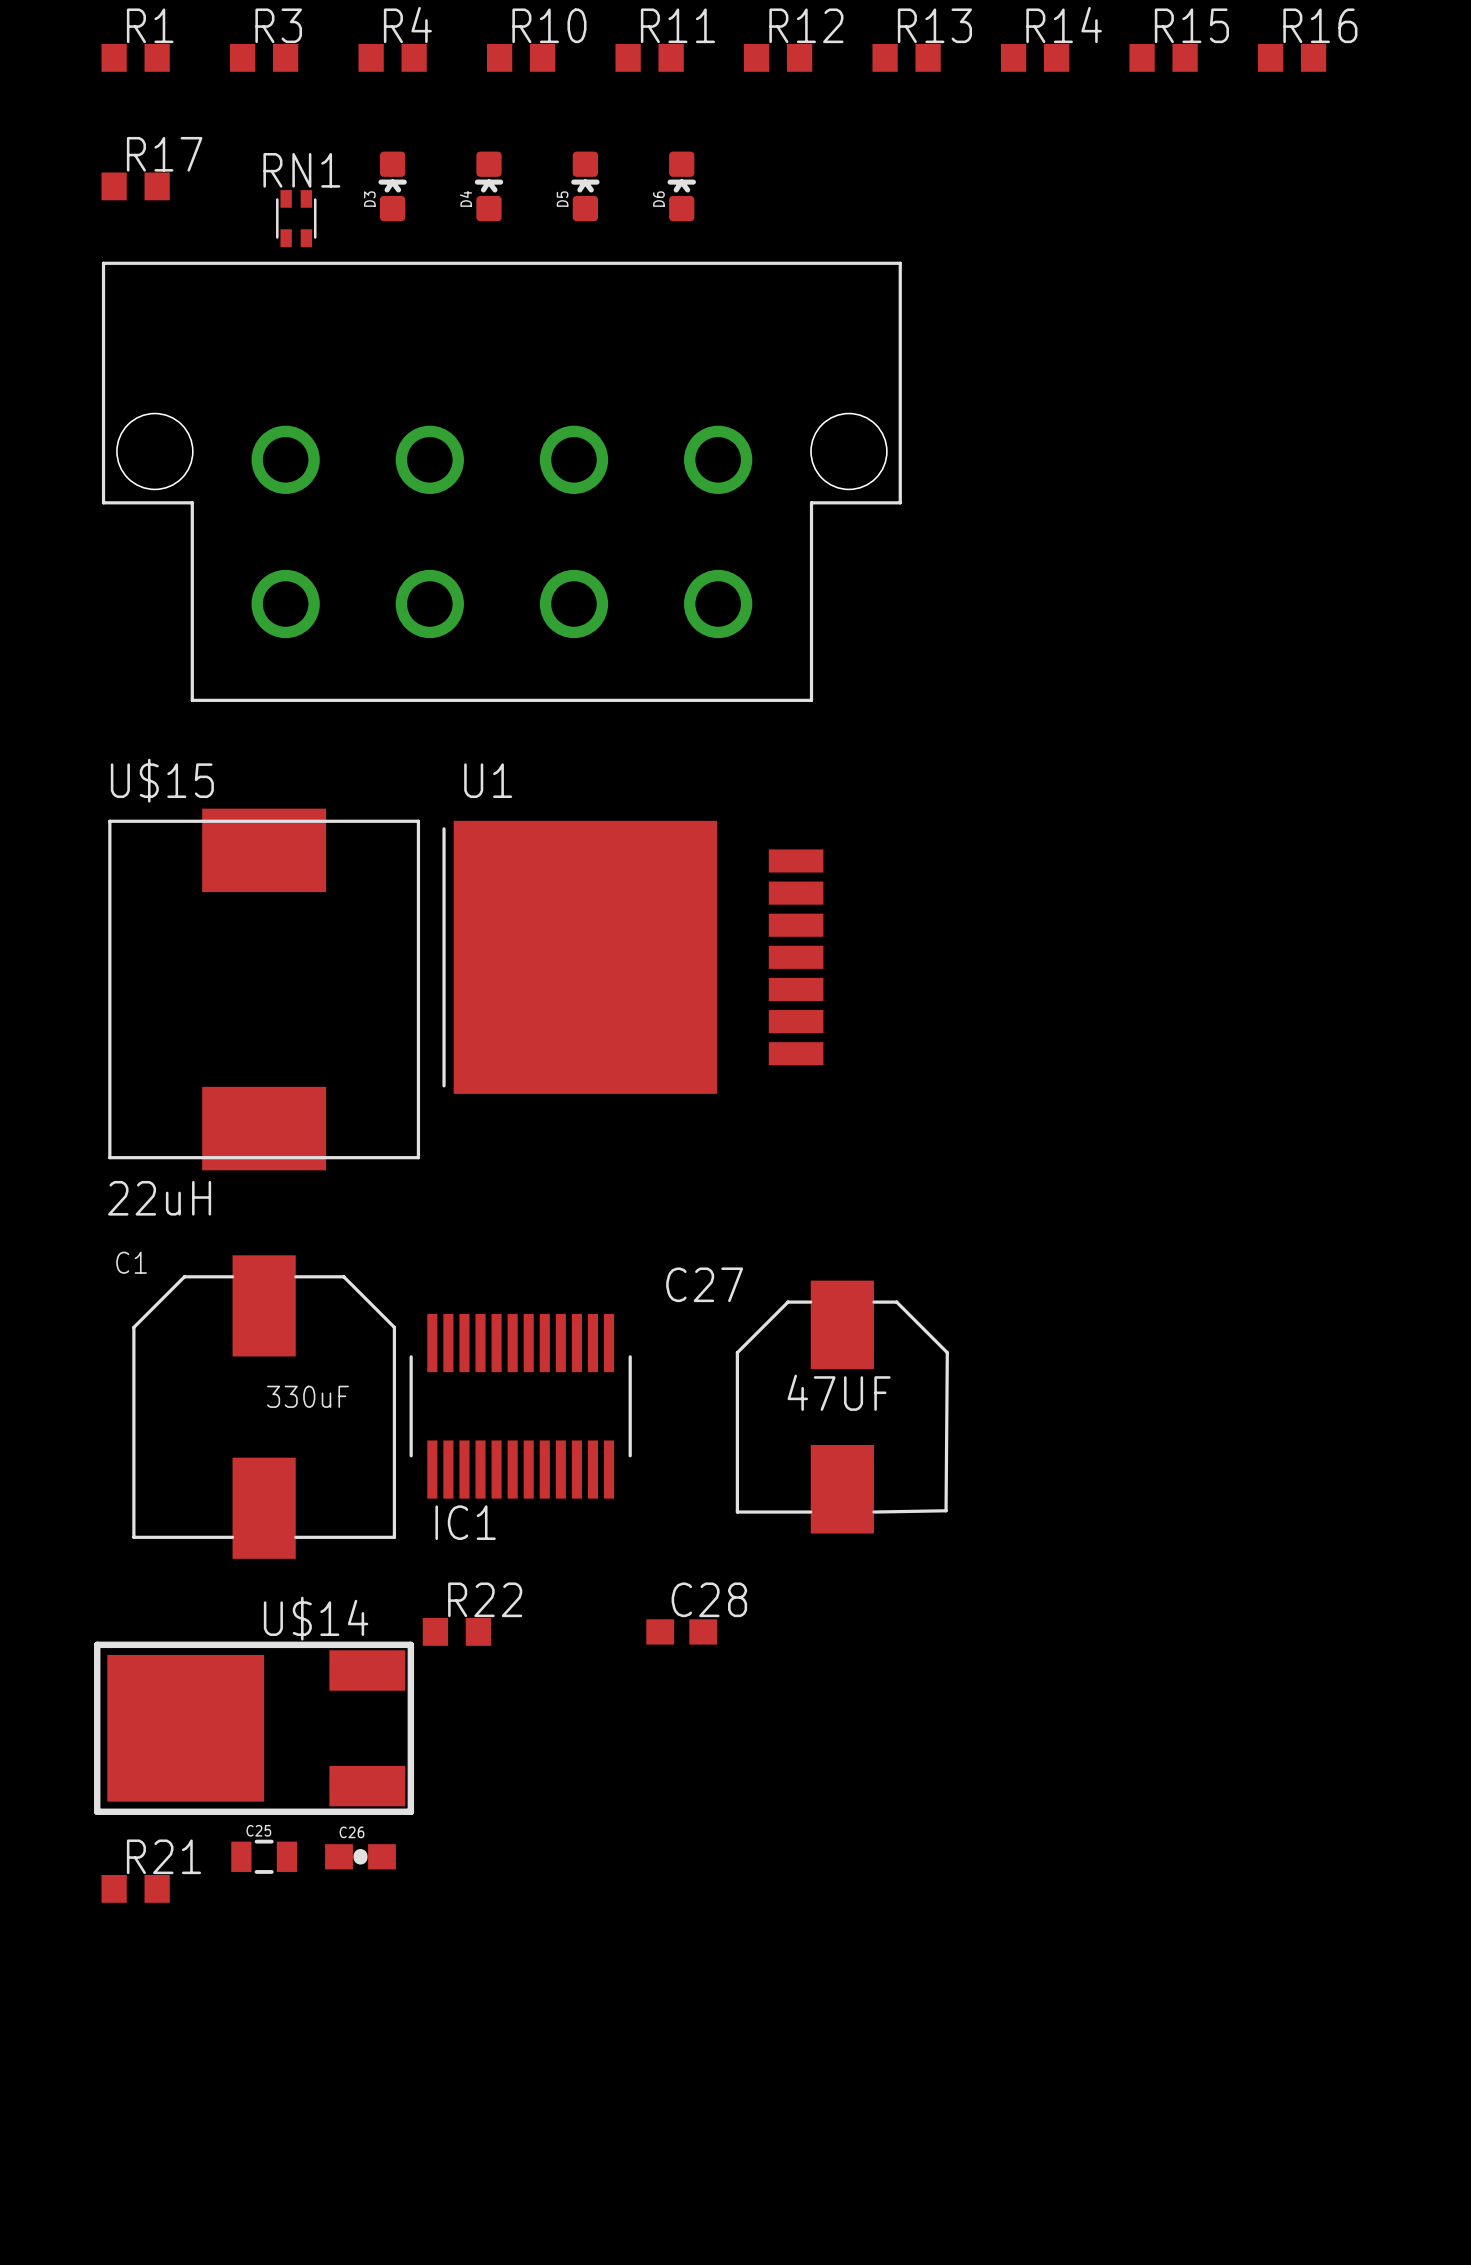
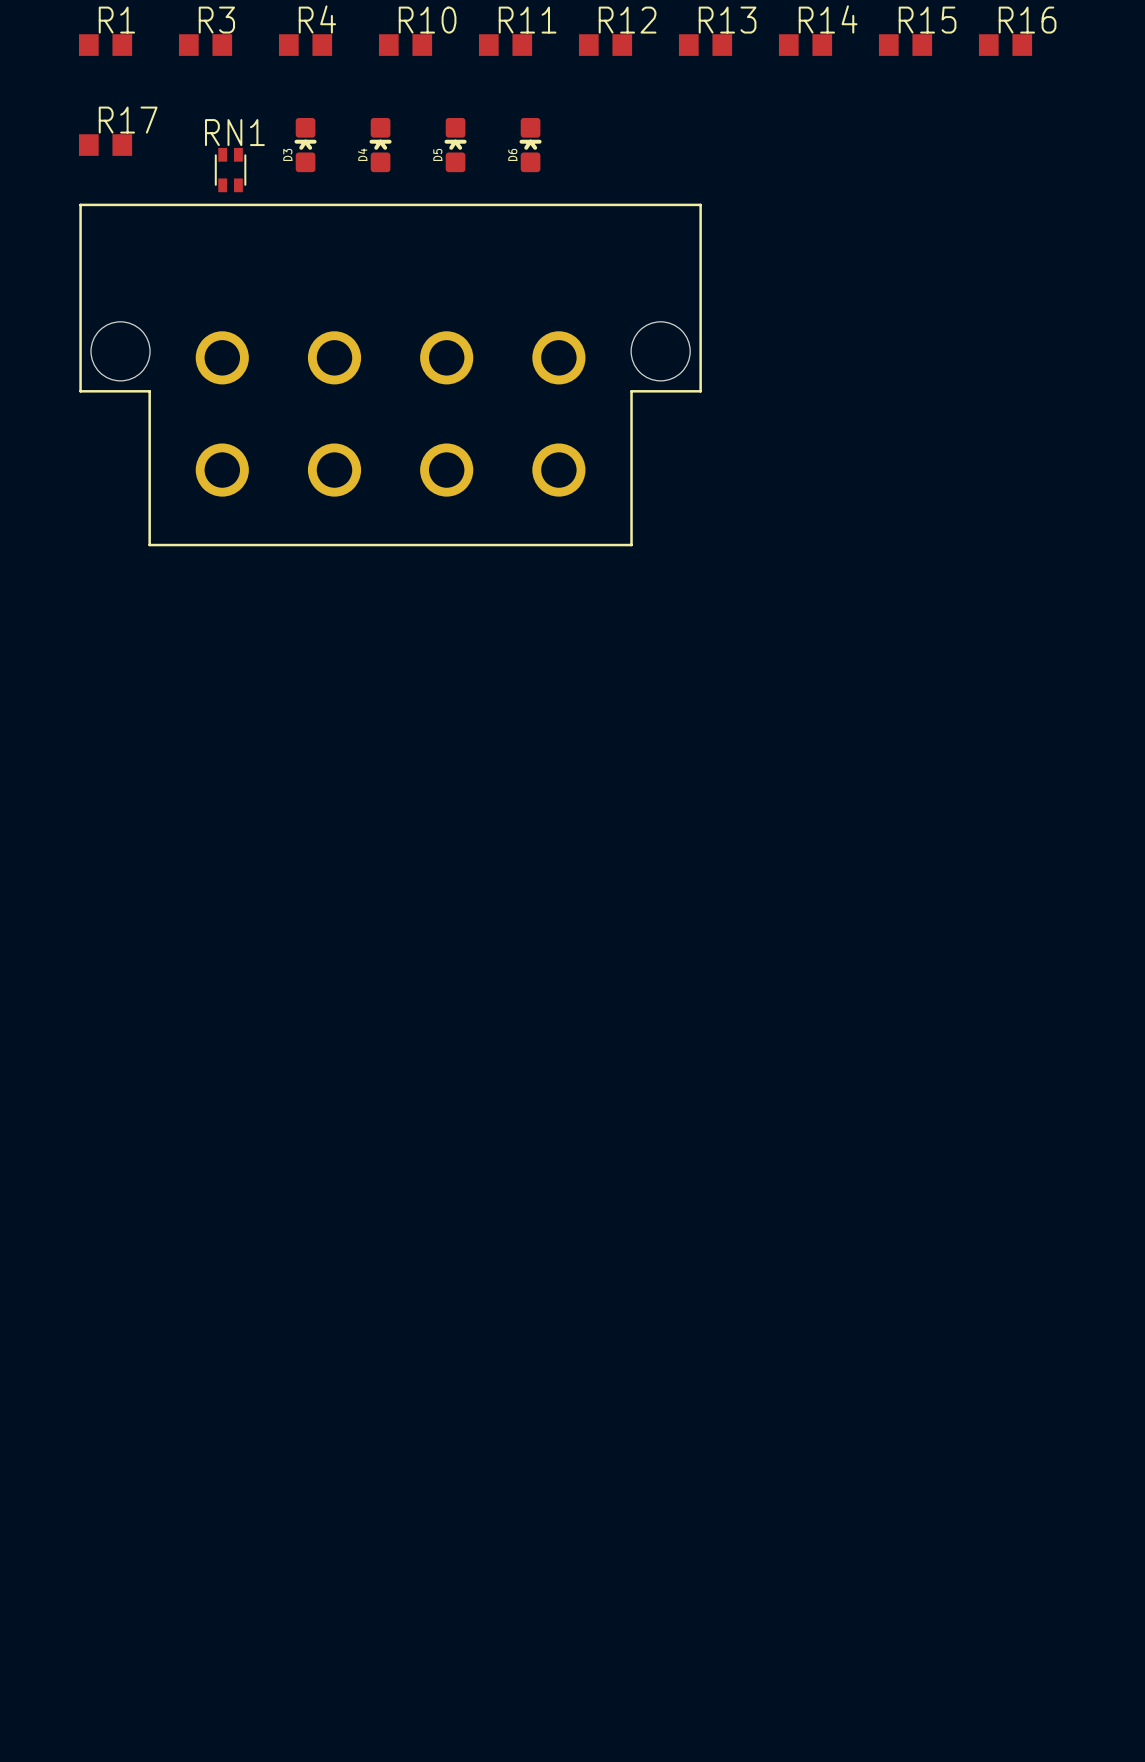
U1: (632, 957) -> none
U$15: 22uH (264, 989) -> none
IC1: (520, 1406) -> none
C1: 330uF (264, 1407) -> none
C27: 47UF (842, 1407) -> none
R22: (456, 1631) -> none
C28: (681, 1631) -> none
U$14: (254, 1728) -> none
C25: (264, 1856) -> none
C26: (360, 1856) -> none
R21: (135, 1888) -> none

